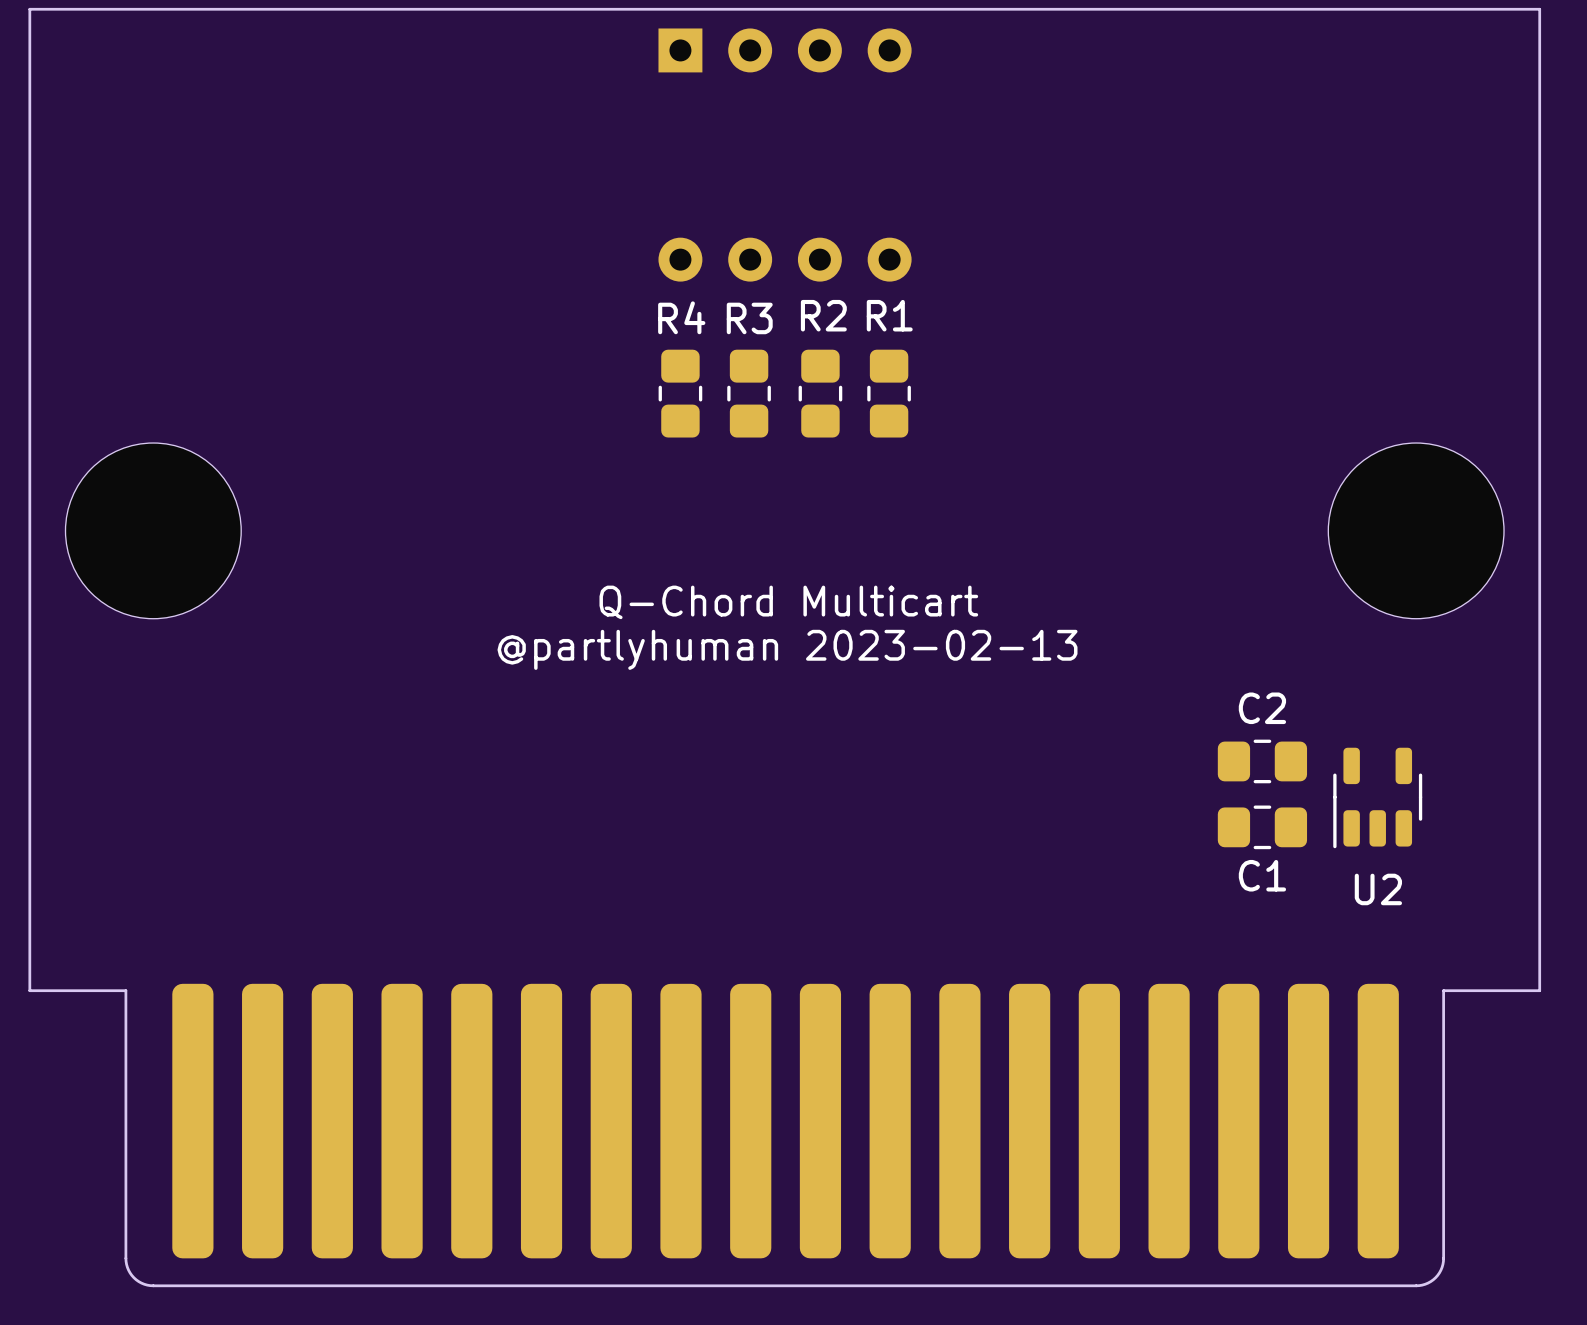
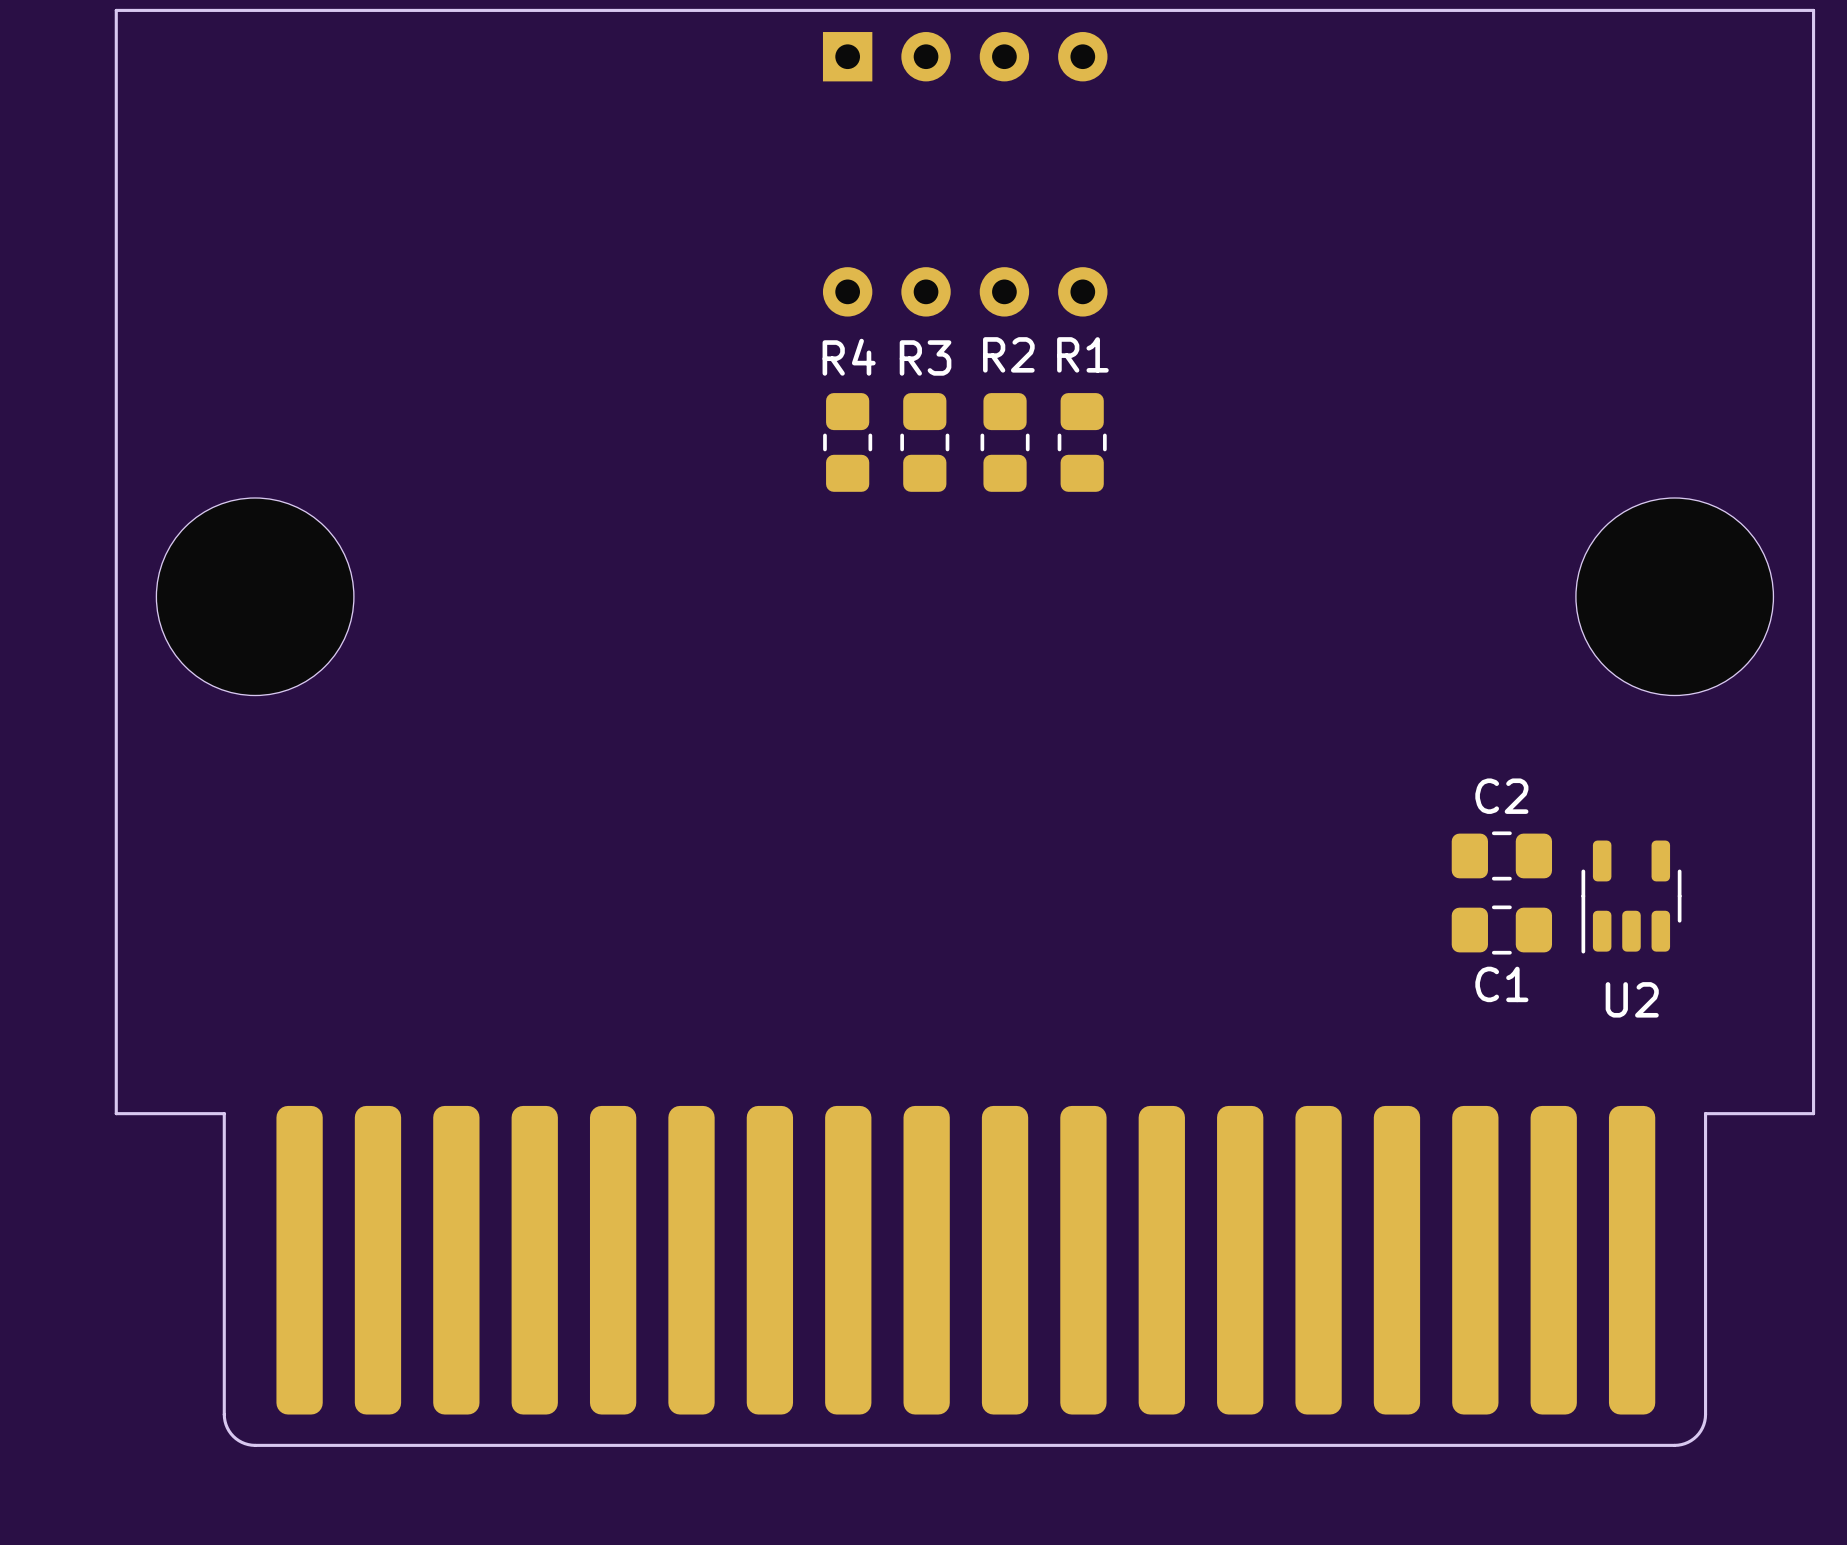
text: Q-Chord Multicart (788, 602) -> none
text: @partlyhuman 2023-02-13 (787, 649) -> none

